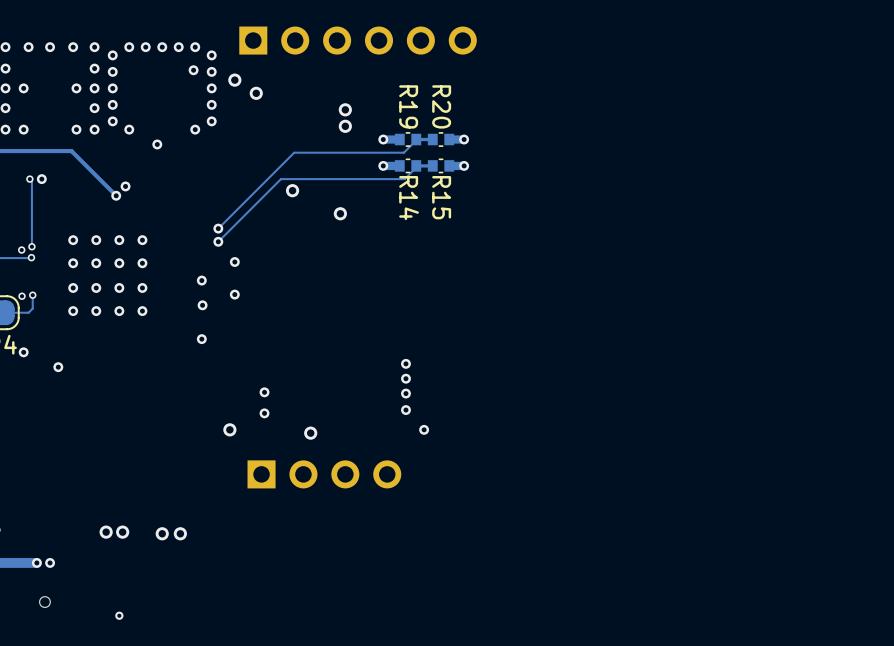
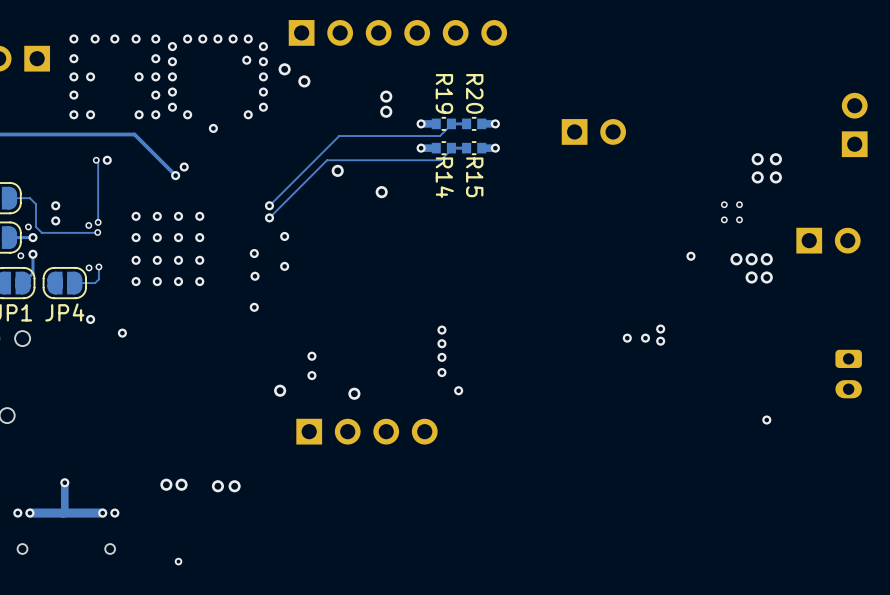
part: none -> (854, 124)
part: none -> (593, 131)
via: none -> (757, 159)
via: none -> (775, 159)
via: none -> (757, 177)
via: none -> (775, 177)
via: none -> (724, 204)
via: none -> (739, 204)
via: none -> (724, 219)
via: none -> (739, 219)
part: none -> (828, 240)
via: none -> (690, 256)
via: none -> (736, 259)
via: none -> (751, 259)
via: none -> (766, 259)
via: none -> (751, 277)
via: none -> (766, 277)
via: none -> (660, 329)
via: none -> (627, 338)
via: none -> (645, 338)
via: none -> (660, 341)
part: none -> (848, 374)
via: none -> (766, 420)

